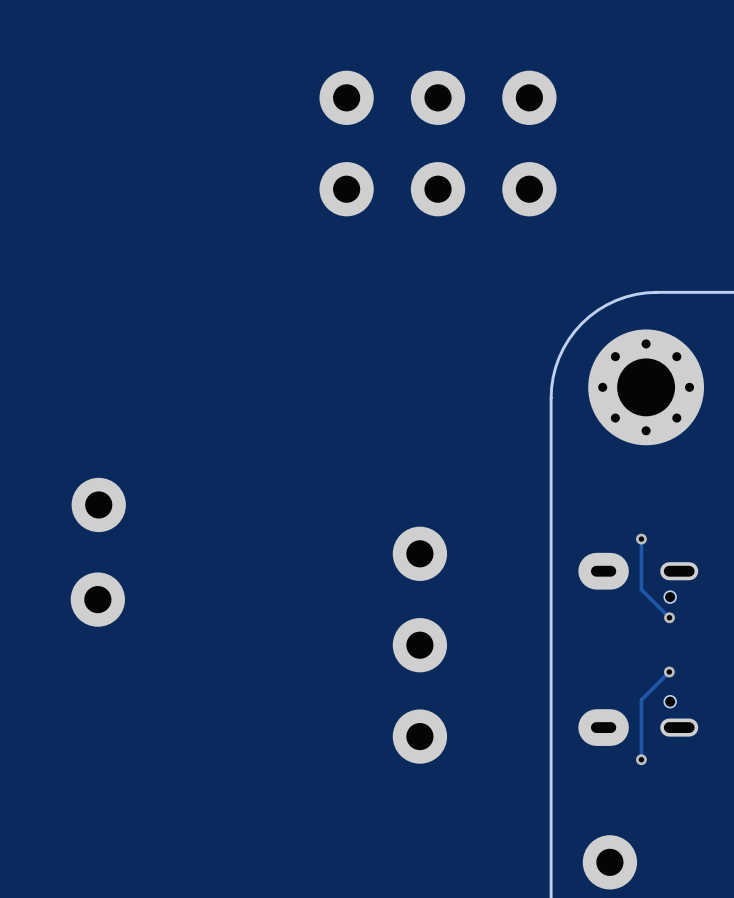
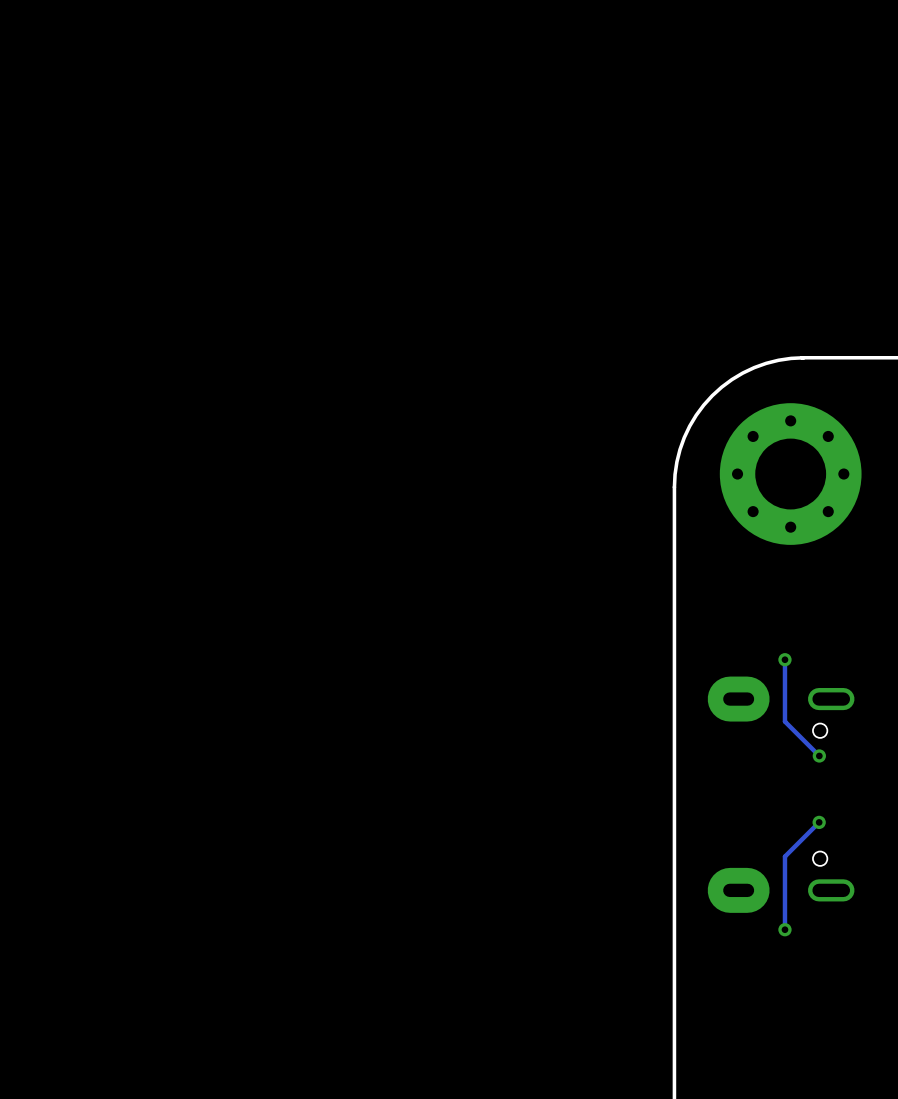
part: (346, 97) -> none
part: (438, 97) -> none
part: (529, 97) -> none
part: (346, 189) -> none
part: (438, 189) -> none
part: (529, 189) -> none
part: (98, 504) -> none
part: (419, 553) -> none
part: (97, 599) -> none
part: (419, 645) -> none
part: (419, 736) -> none
part: (609, 862) -> none

